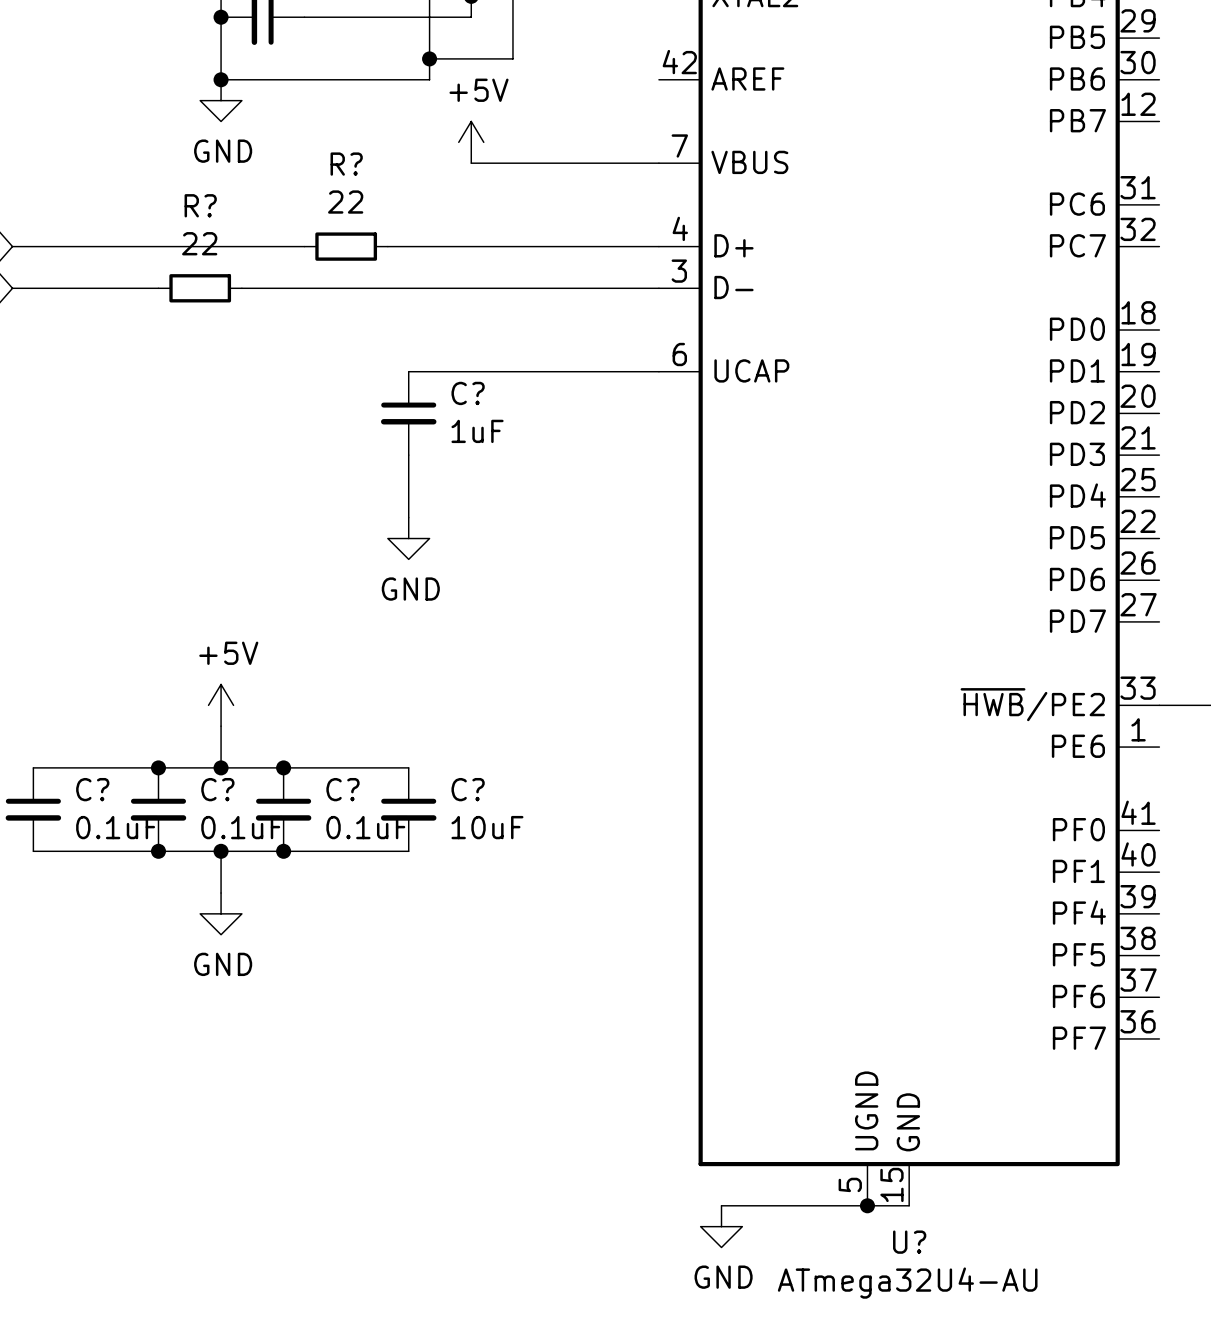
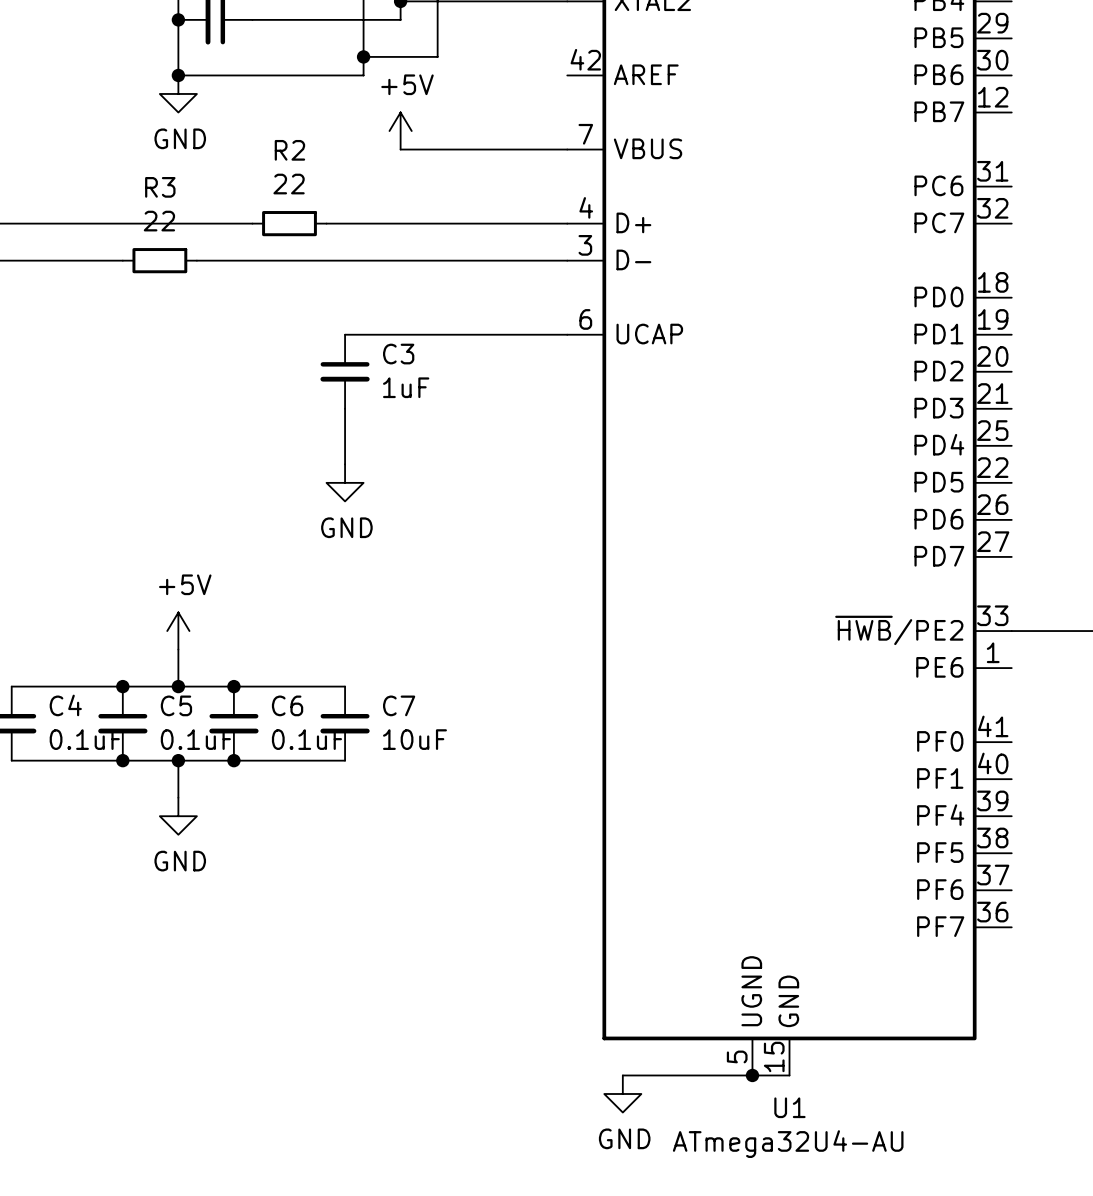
R? name: R? (346, 164) -> R2 (289, 150)
R? name: R? (200, 205) -> R3 (160, 187)
C? name: C? (468, 393) -> C3 (398, 354)
C? name: C? (92, 789) -> C4 (65, 705)
C? name: C? (217, 789) -> C5 (176, 705)
C? name: C? (342, 789) -> C6 (287, 705)
C? name: C? (468, 789) -> C7 (399, 705)
U? name: U? (909, 1242) -> U1 (789, 1107)

